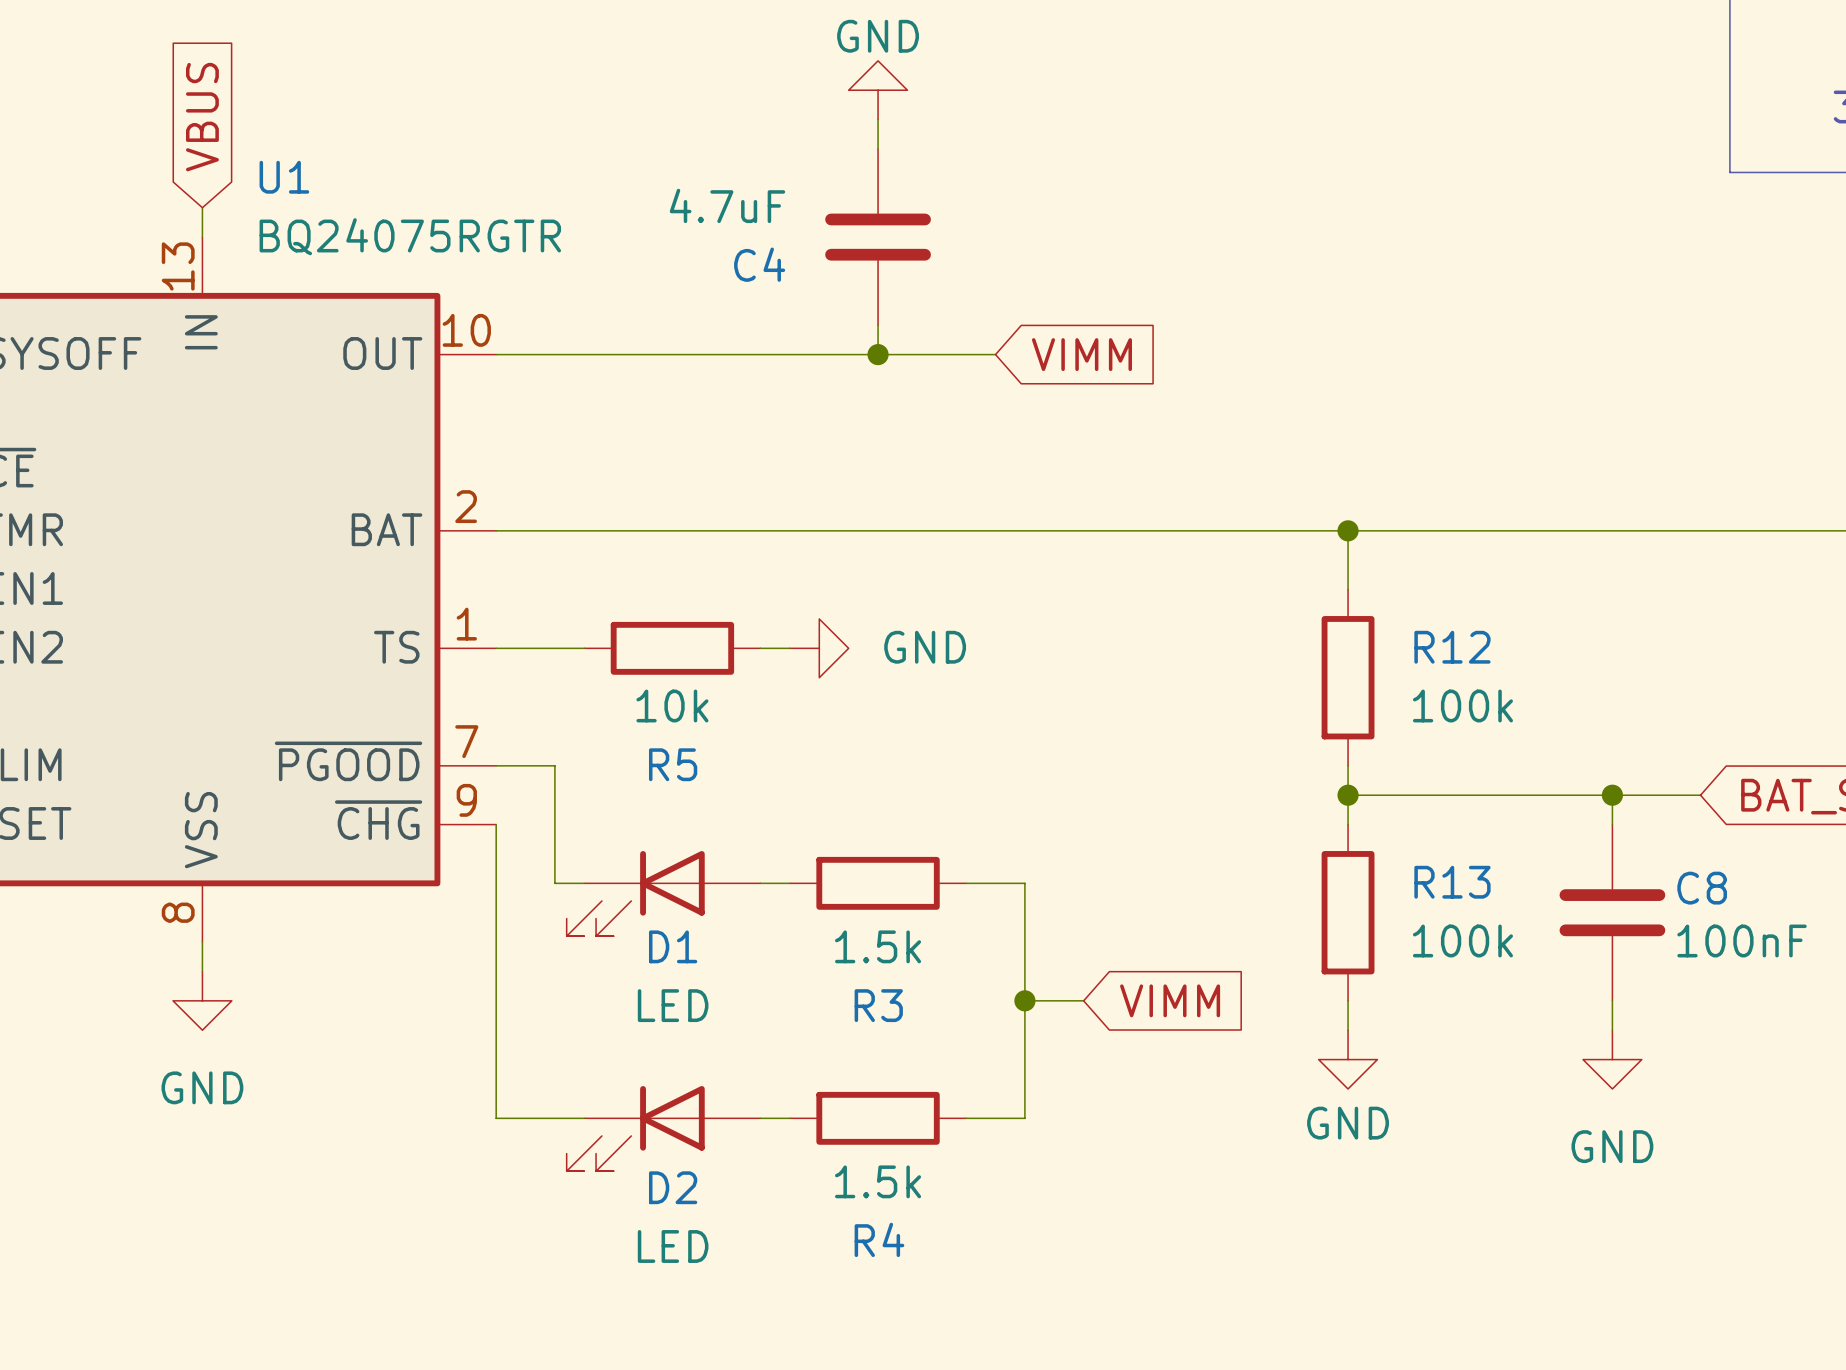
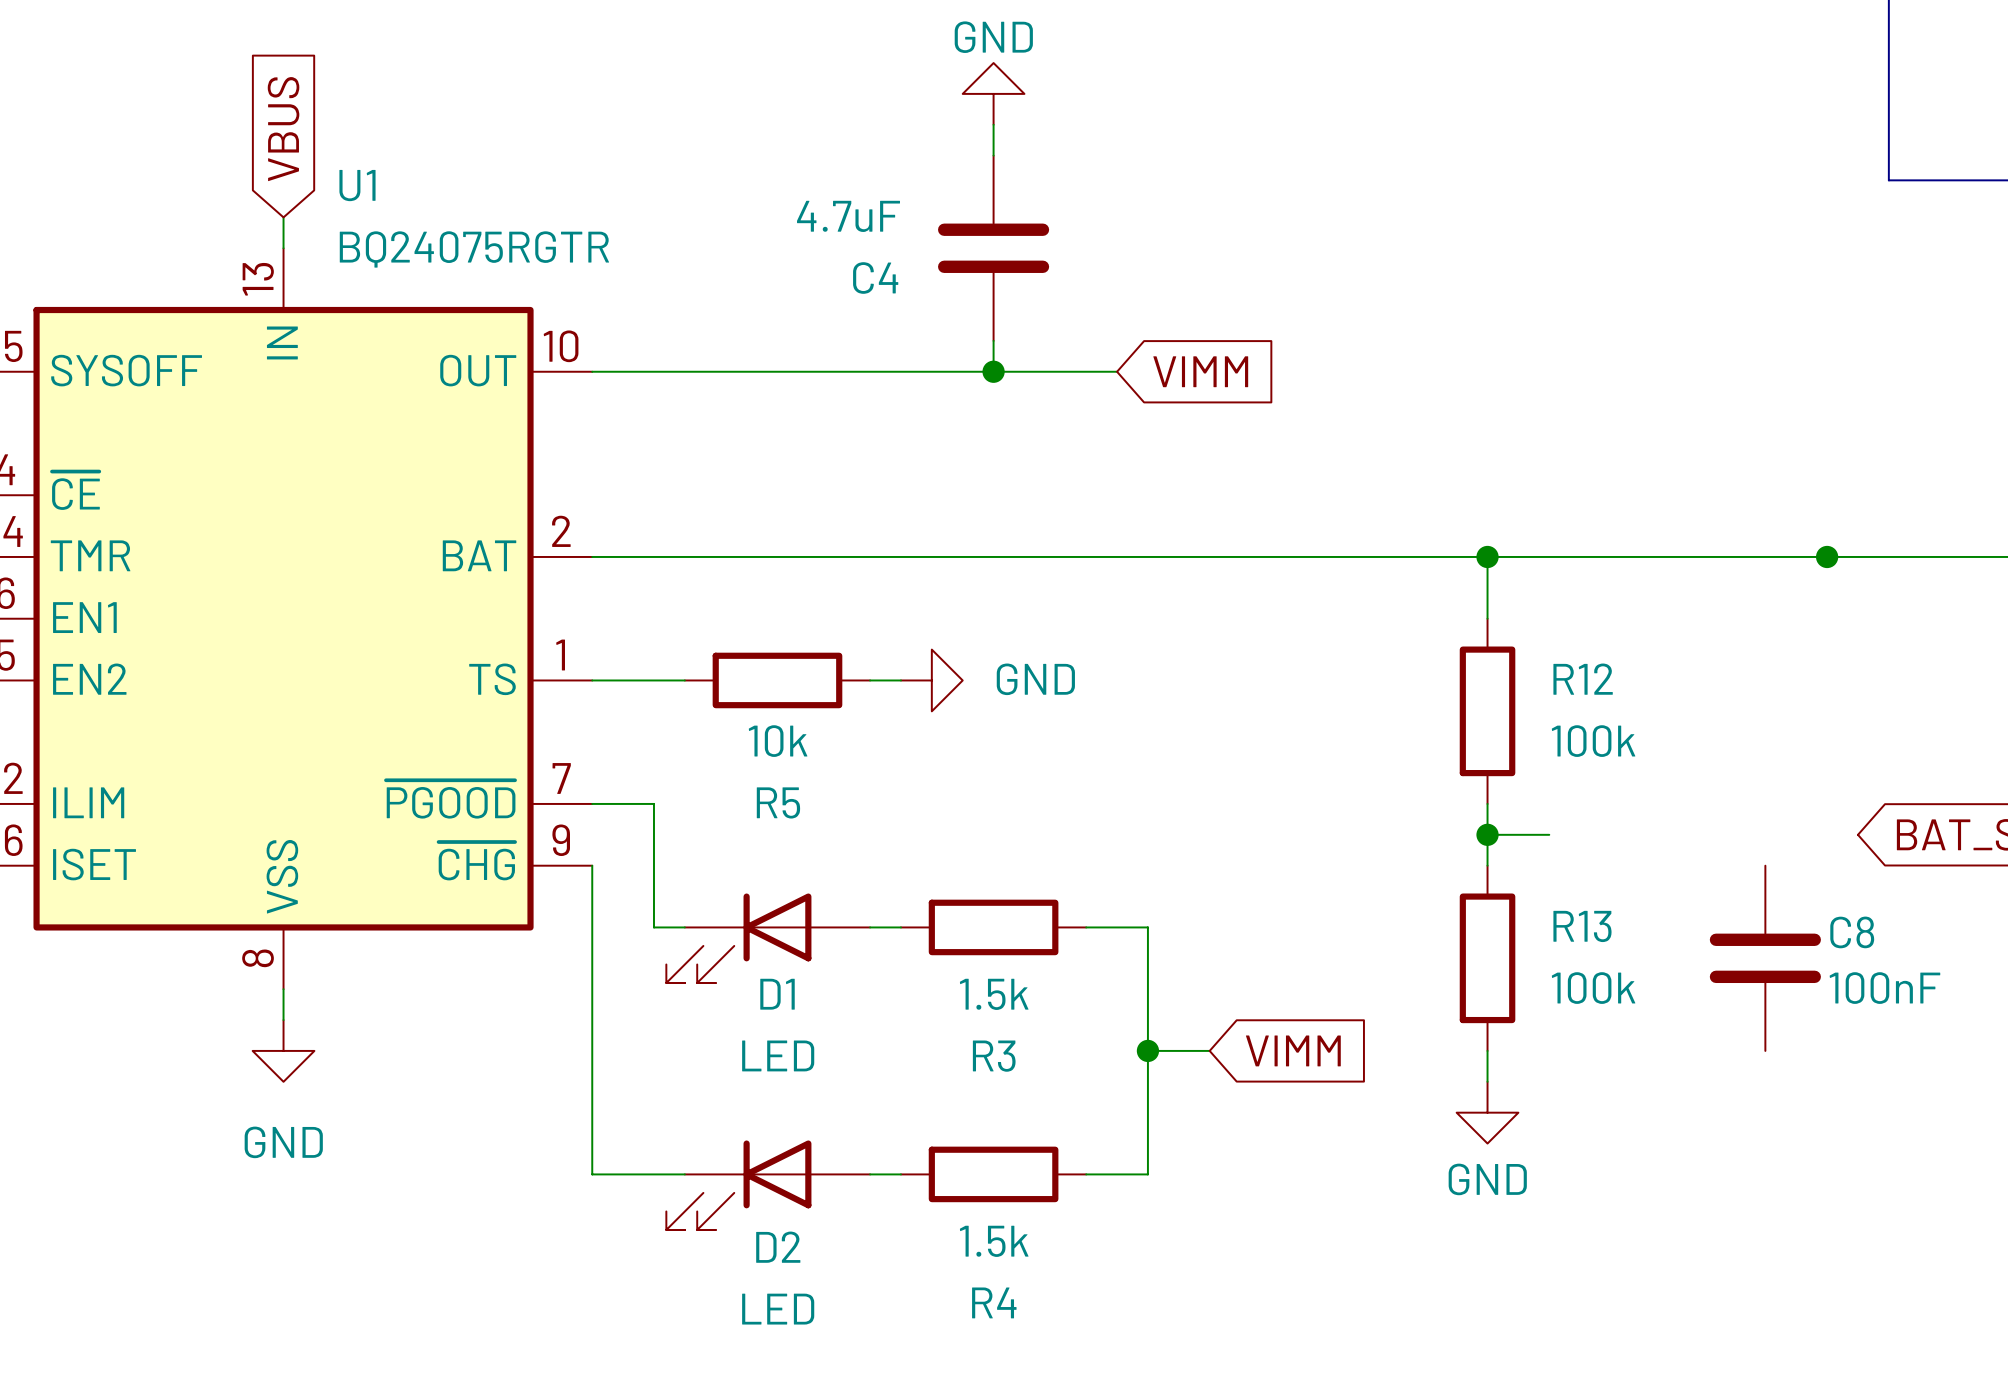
junction: none -> (1827, 556)
wire: (1406, 795) (1700, 795) -> none
wire: (1612, 795) (1612, 824) -> none
junction: (1612, 795) -> none
wire: (1612, 1000) (1612, 1030) -> none
power symbol: GND (1612, 1059) -> none

